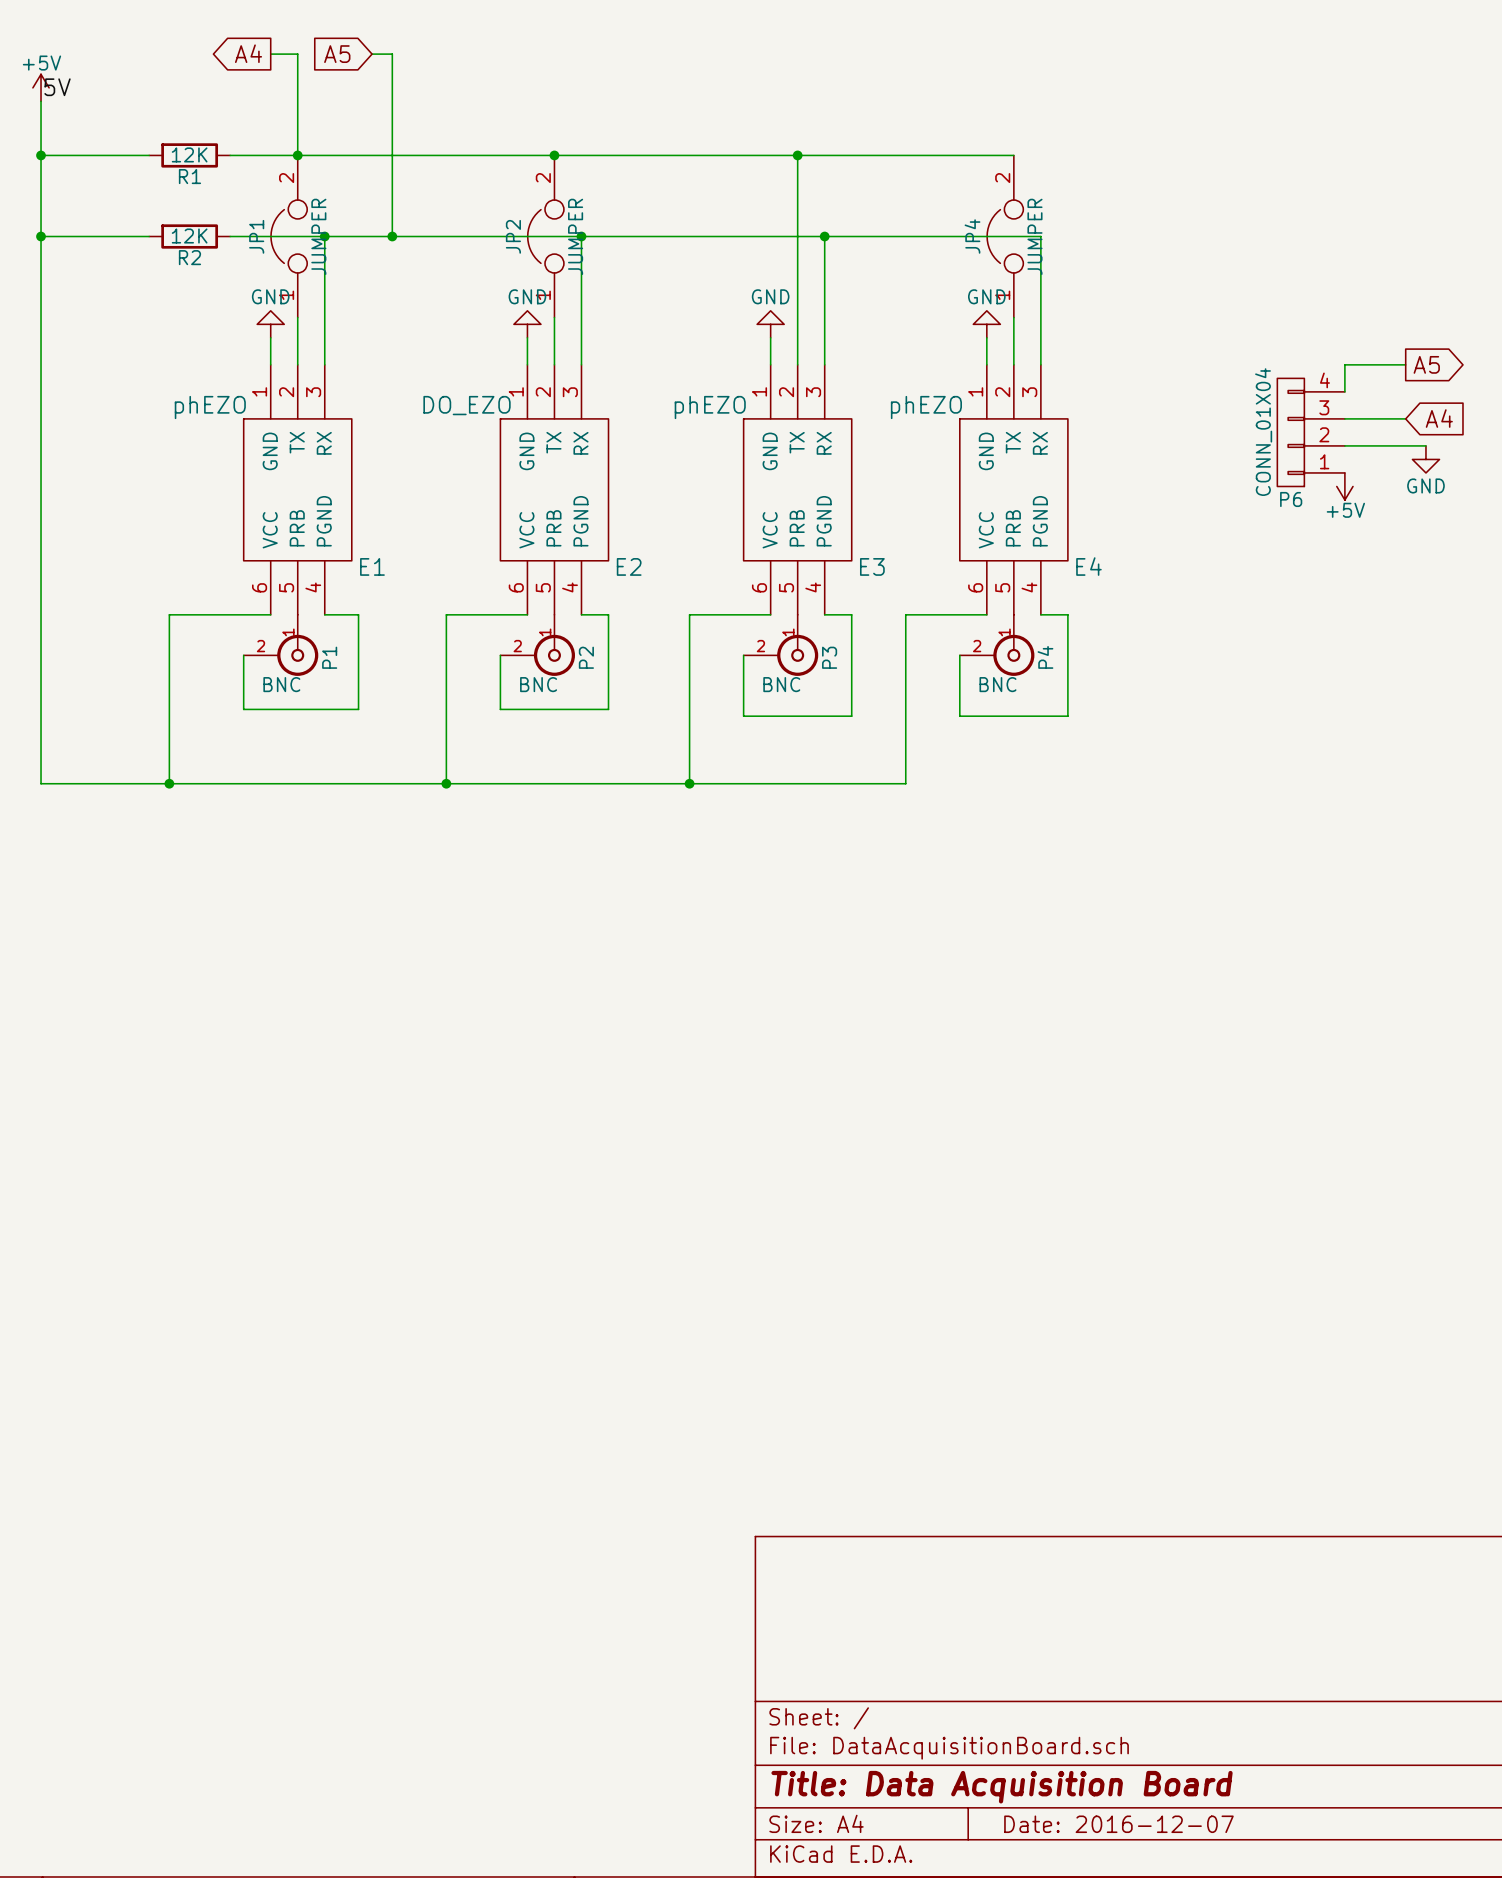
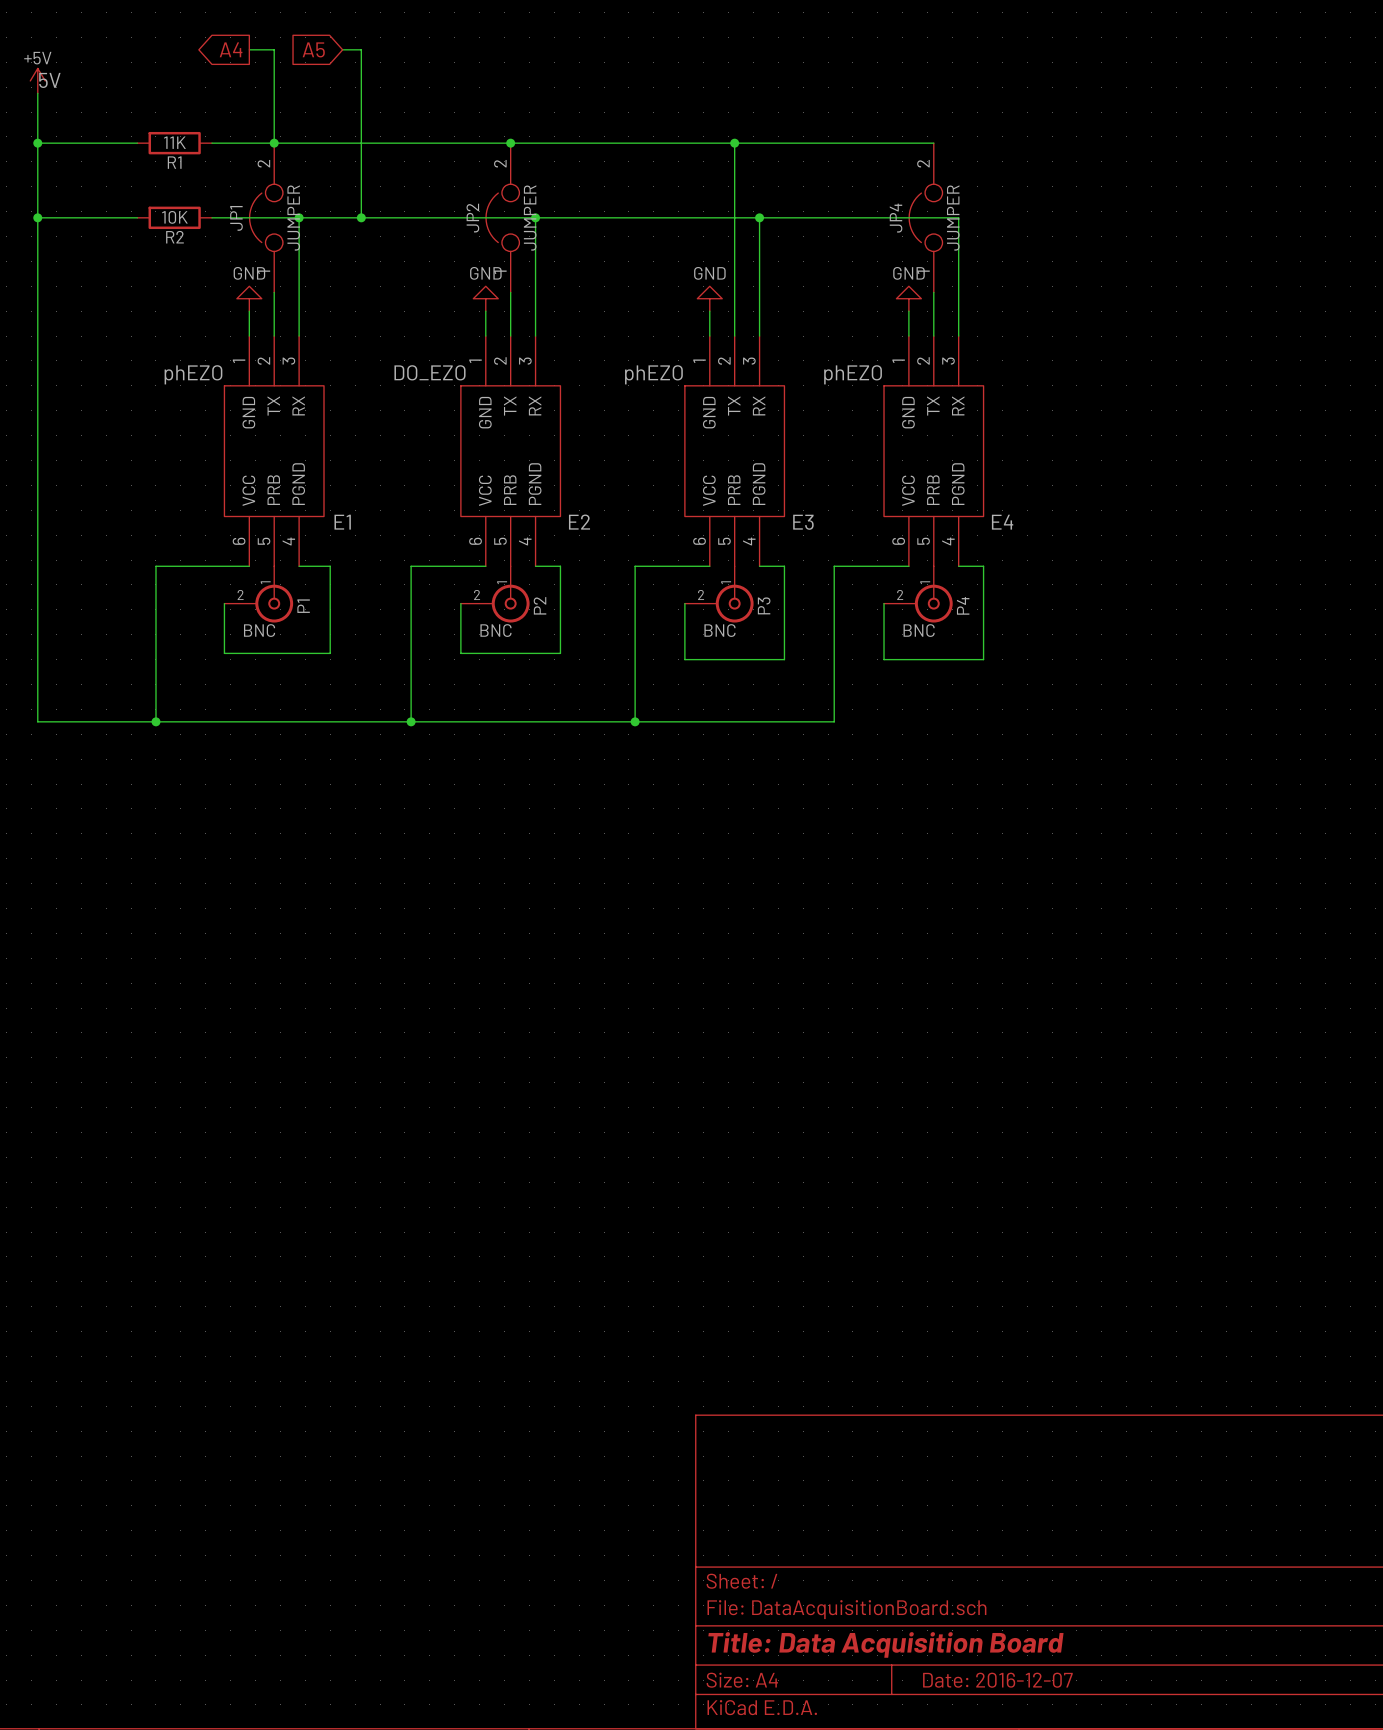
R1 value: 12K (189, 154) -> 11K (174, 142)
R2 value: 12K (189, 236) -> 10K (174, 217)
wire: (1405, 364) (1344, 364) (1344, 391) -> none
global label: A5 (1426, 364) -> none
wire: (1344, 418) (1405, 418) -> none
global label: A4 (1439, 418) -> none
P6: CONN_01X04 (1311, 432) -> none
wire: (1344, 445) (1425, 445) -> none
power symbol: GND (1425, 459) -> none
power symbol: +5V (1344, 486) -> none

